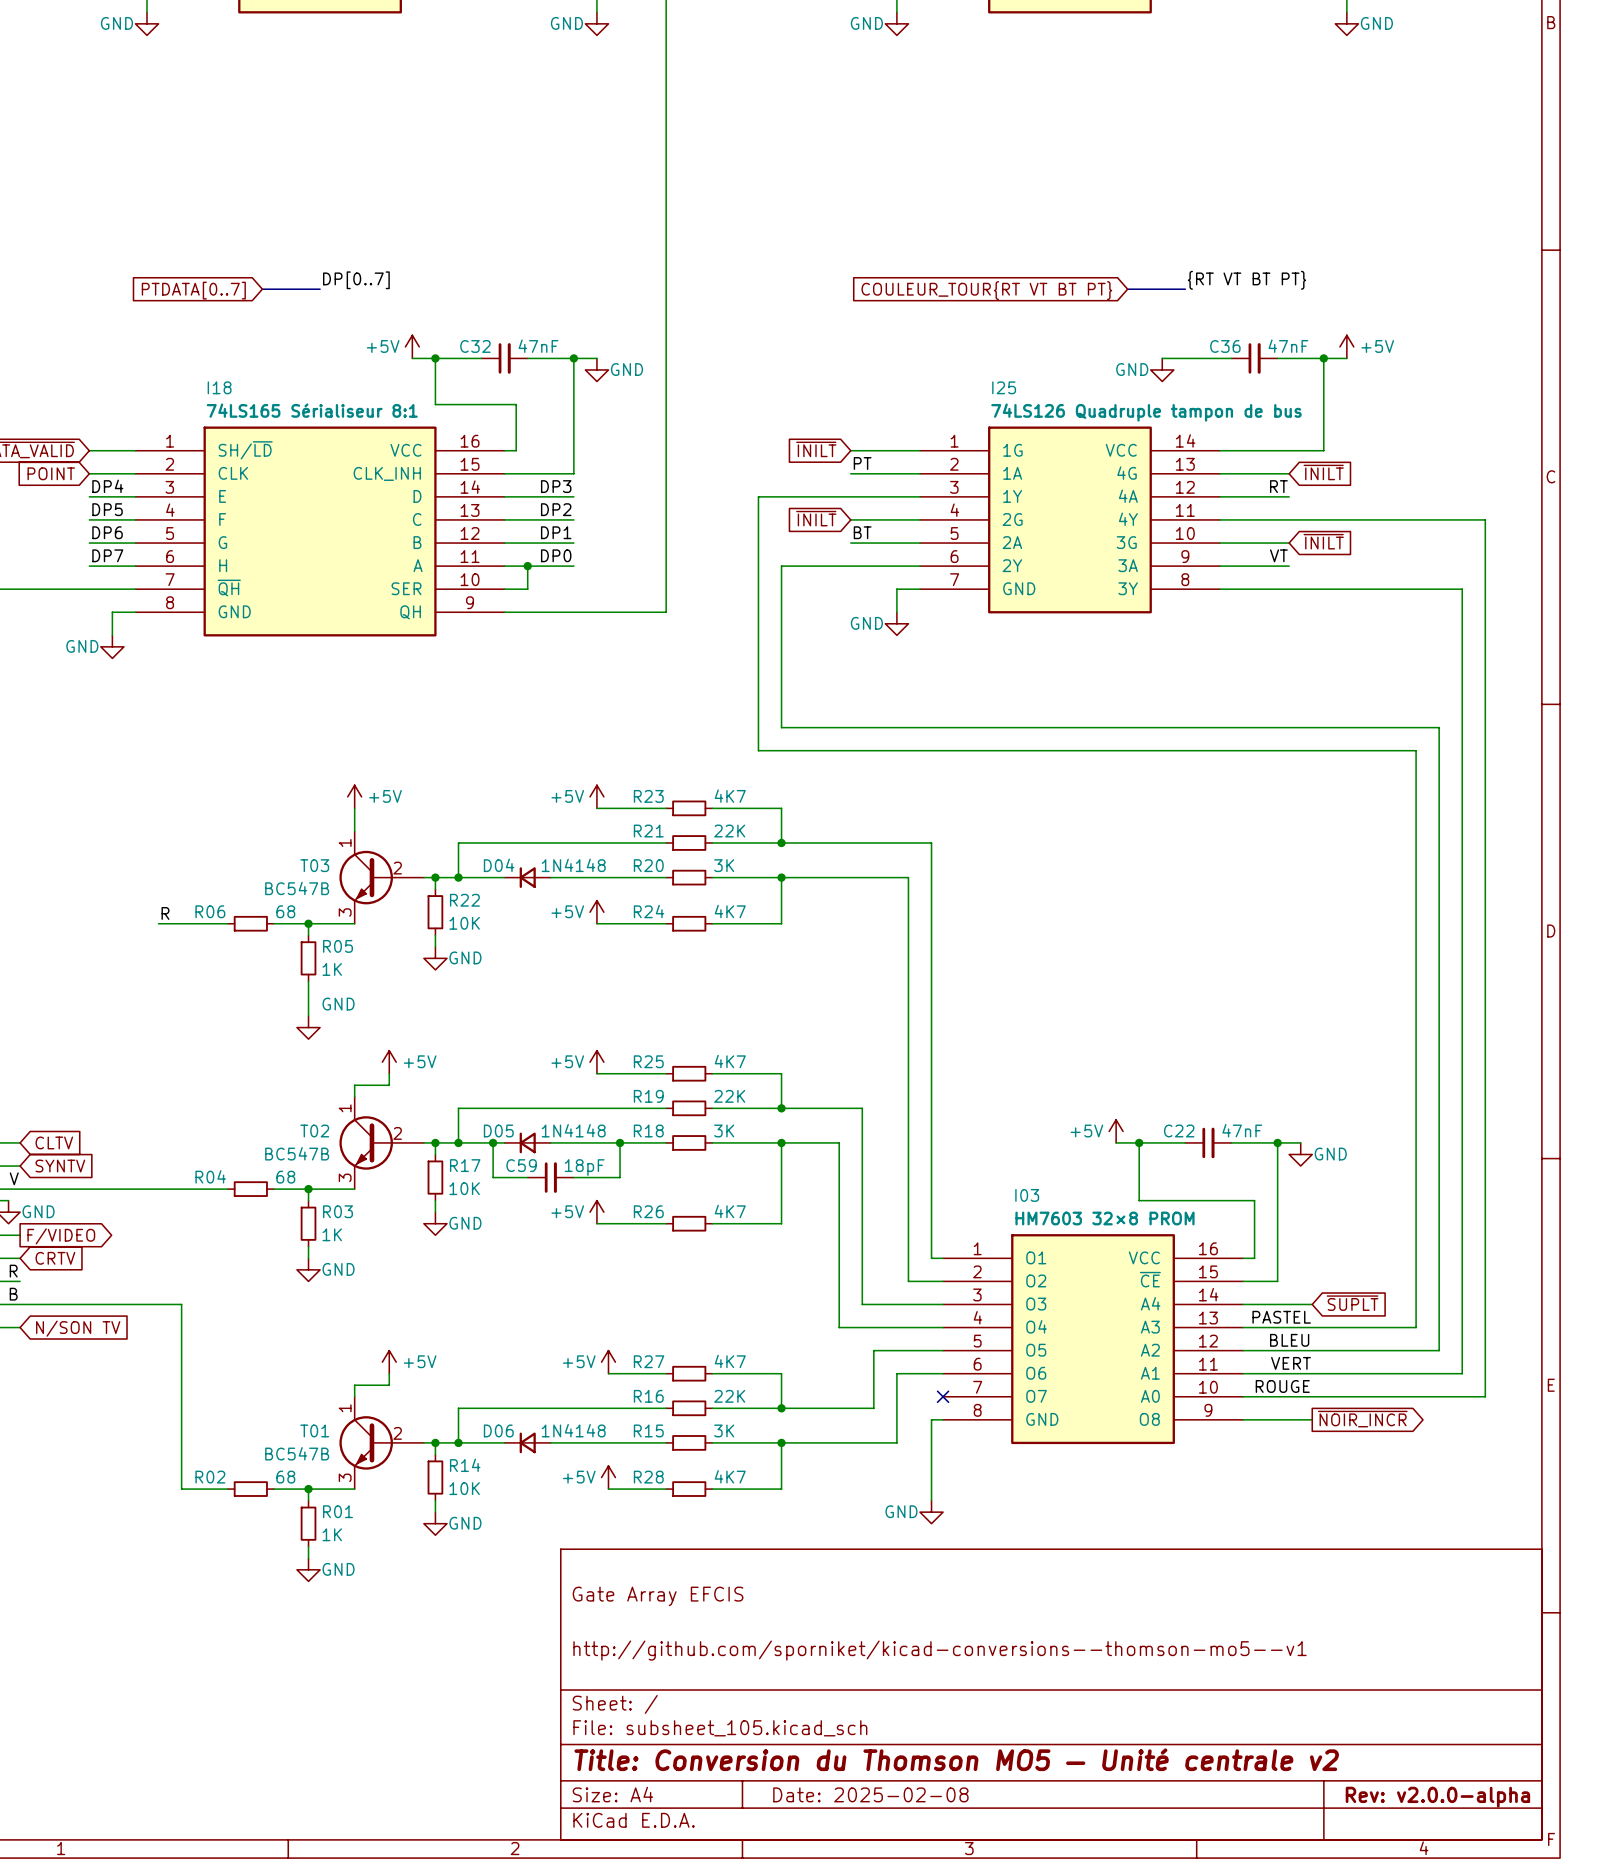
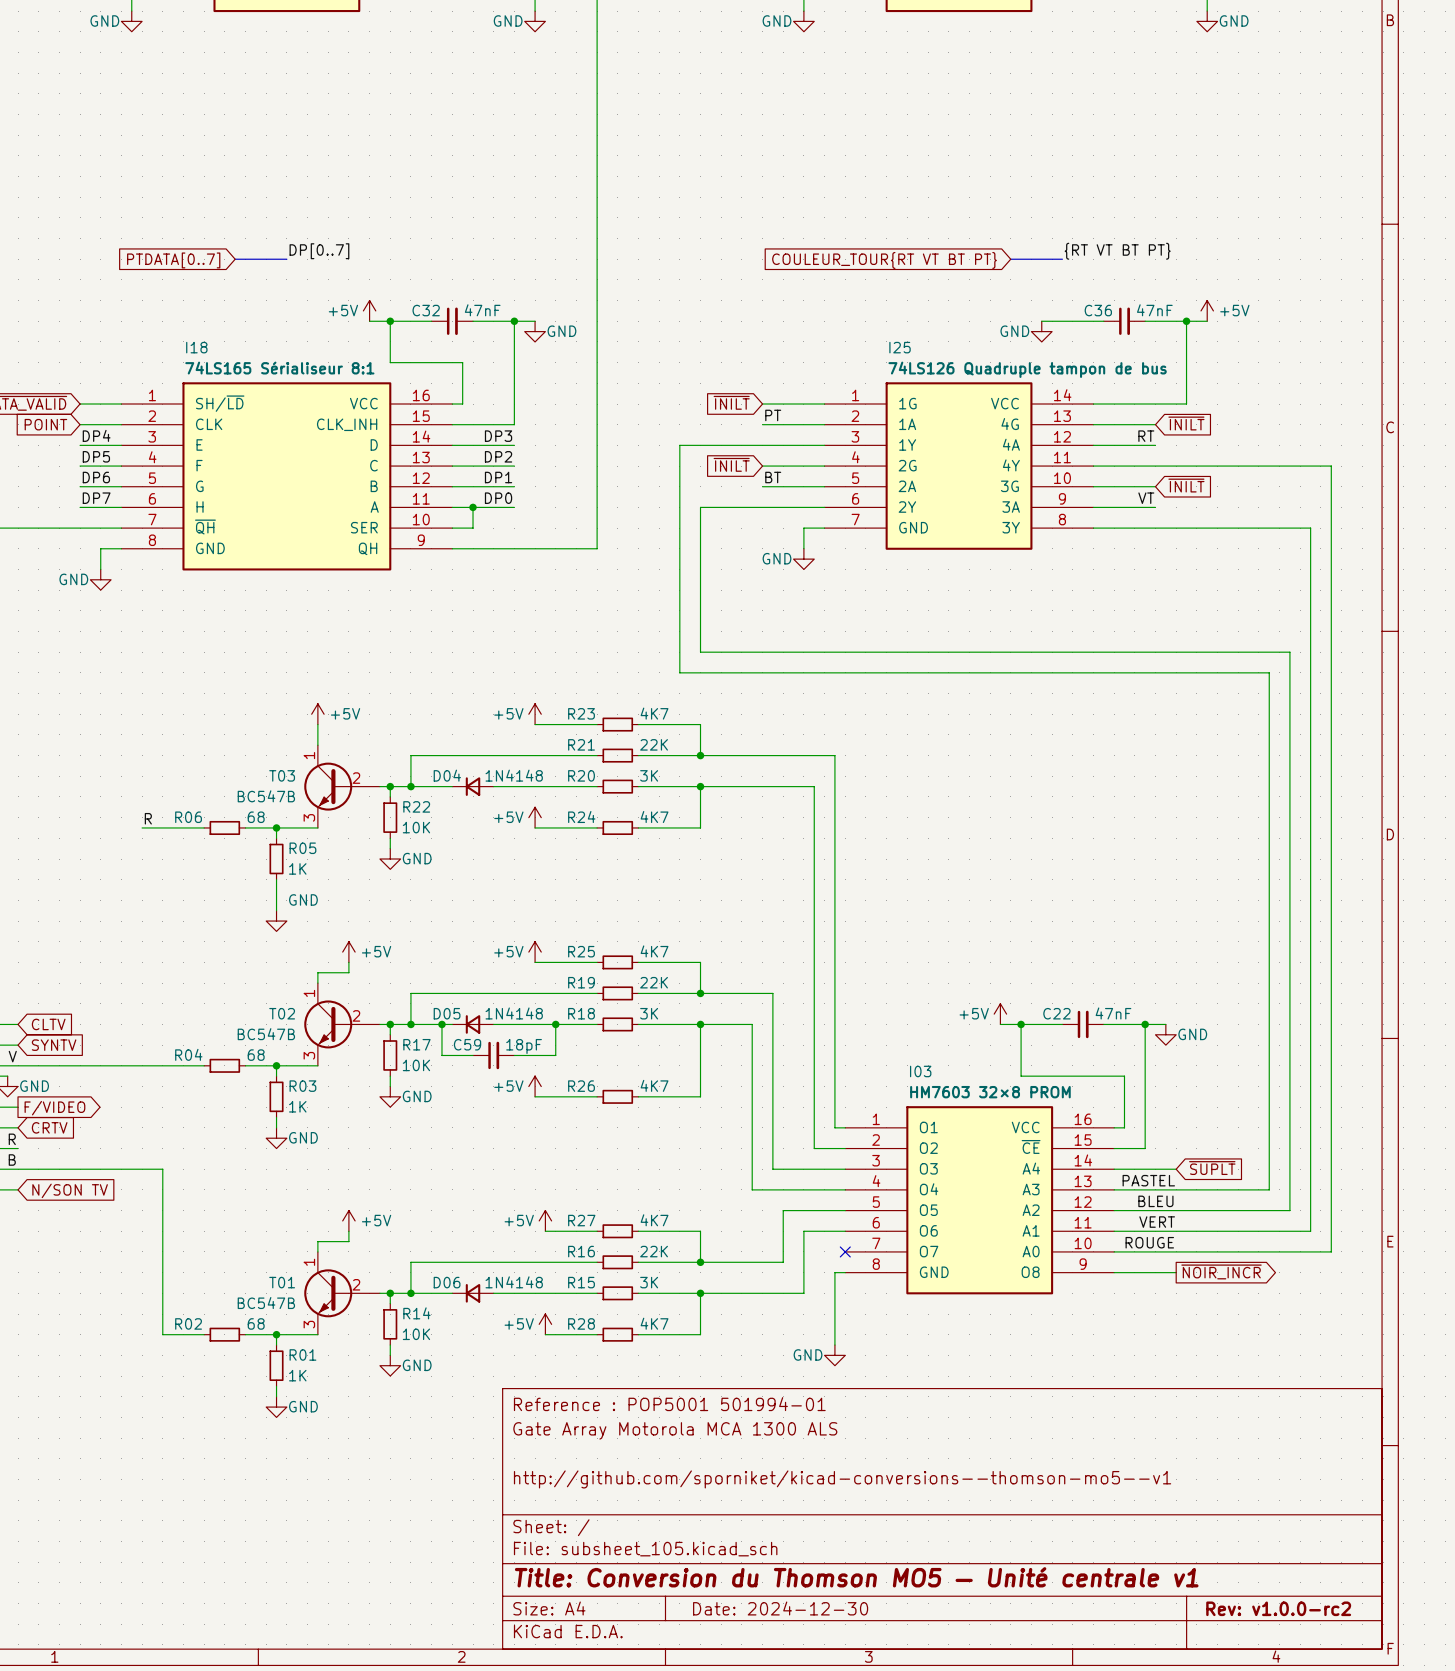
title block: none -> Reference : POP5001 501994-01 (669, 1404)
title block: Gate Array EFCIS (658, 1596) -> Gate Array Motorola MCA 1300 ALS (675, 1430)
title block: Title: Conversion du Thomson MO5 — Unité centrale v2 (956, 1759) -> Title: Conversion du Thomson MO5 — Unité centrale v1 (856, 1577)
title block: Date: 2025-02-08 (870, 1794) -> Date: 2024-12-30 (780, 1608)
title block: Rev: v2.0.0-alpha (1437, 1797) -> Rev: v1.0.0-rc2 (1278, 1608)

